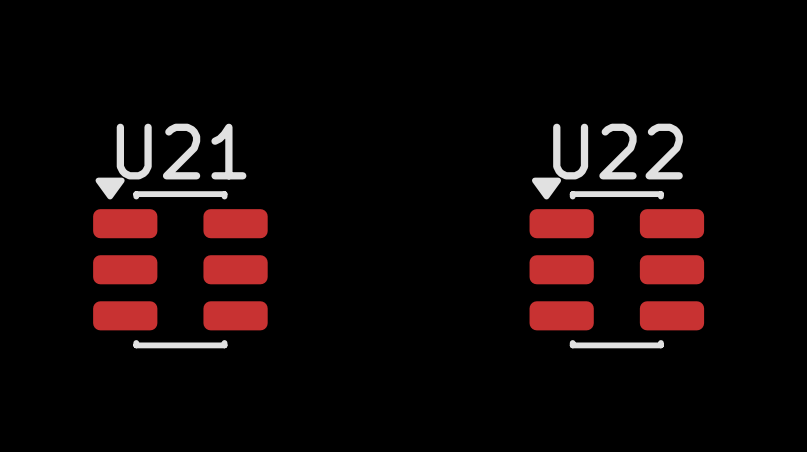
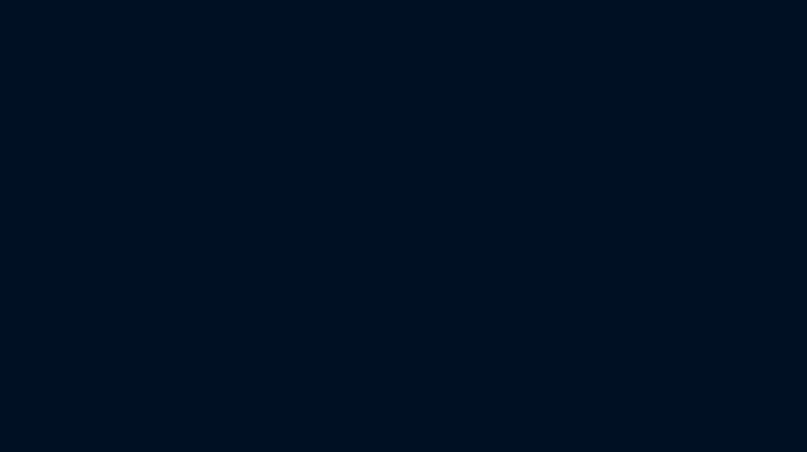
U21: (180, 262) -> none
U22: (616, 262) -> none

